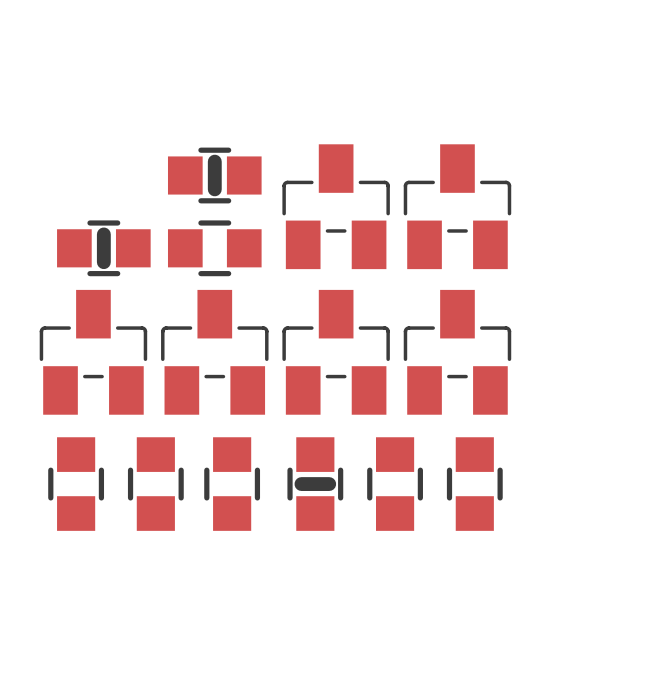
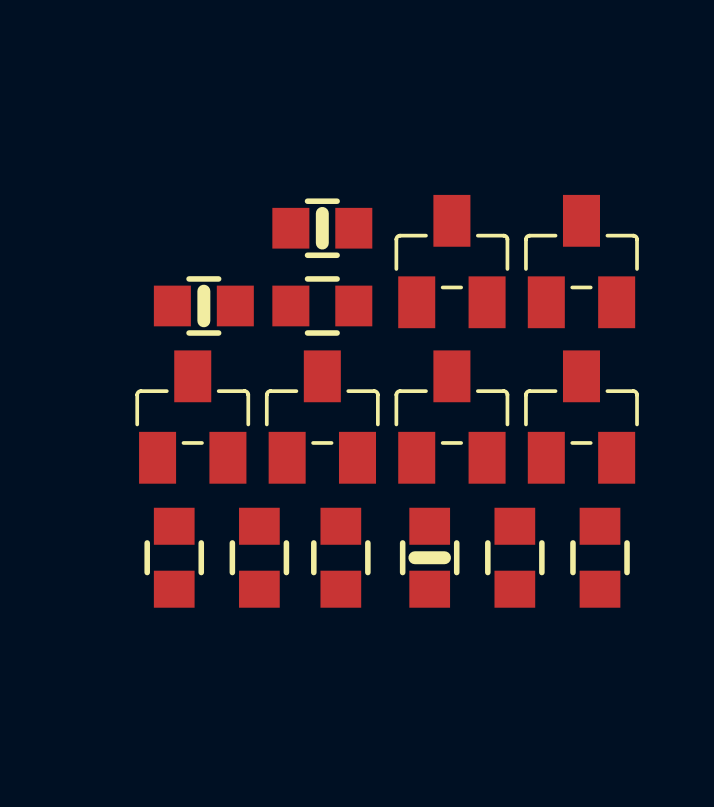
part footprint: [167, 147, 262, 204] -> [272, 198, 373, 259]
line: (214, 161) (214, 189) -> none
part footprint: [57, 220, 151, 277] -> [153, 276, 254, 336]
line: (103, 234) (103, 262) -> none
part footprint: [287, 437, 344, 531] -> [399, 507, 460, 608]
line: (301, 484) (329, 484) -> none

